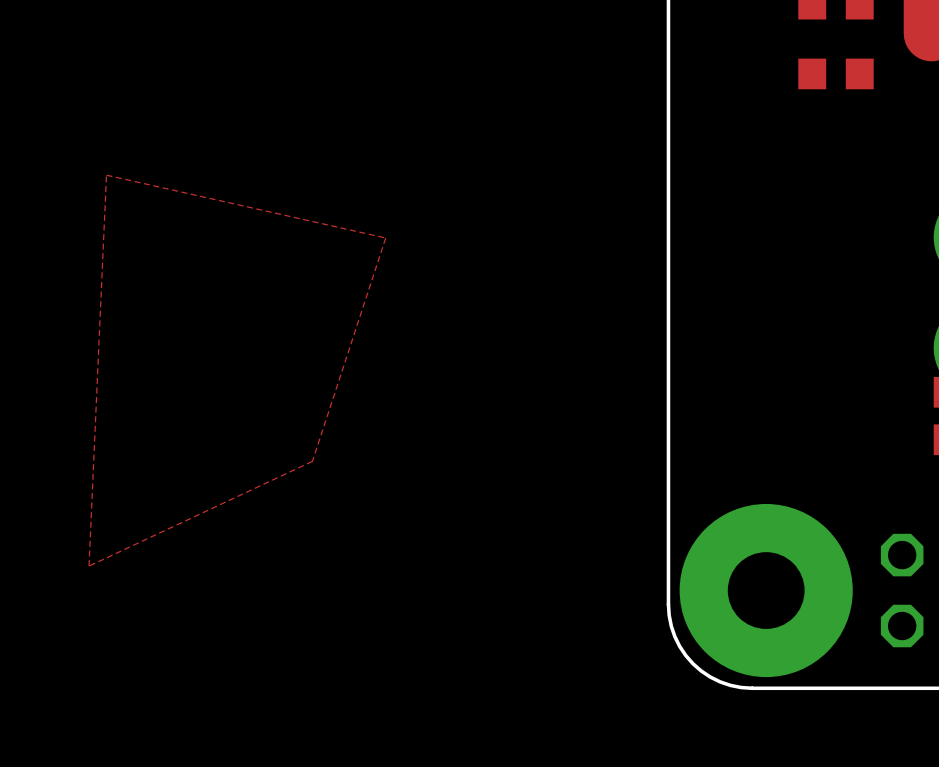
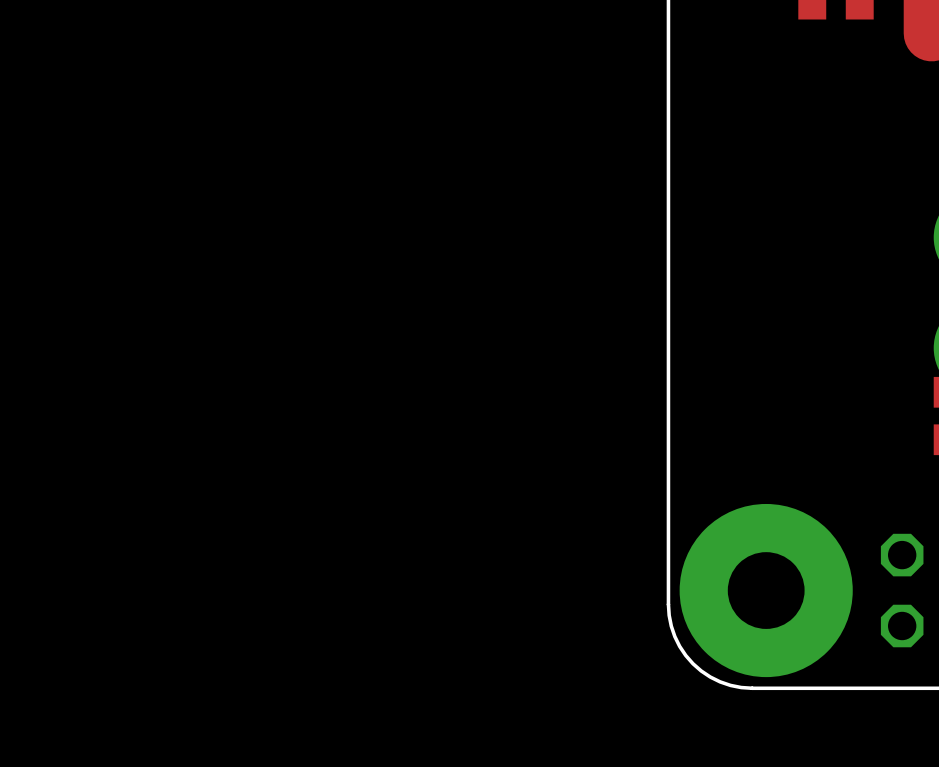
part: (836, 73) -> none
top zone outline: (106, 175) (89, 566) (312, 461) (385, 238) (106, 175) -> none

